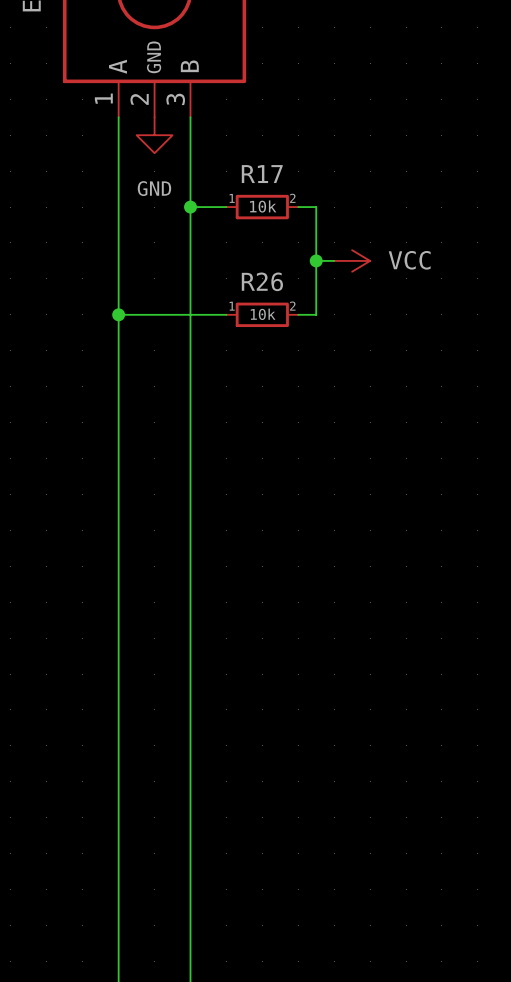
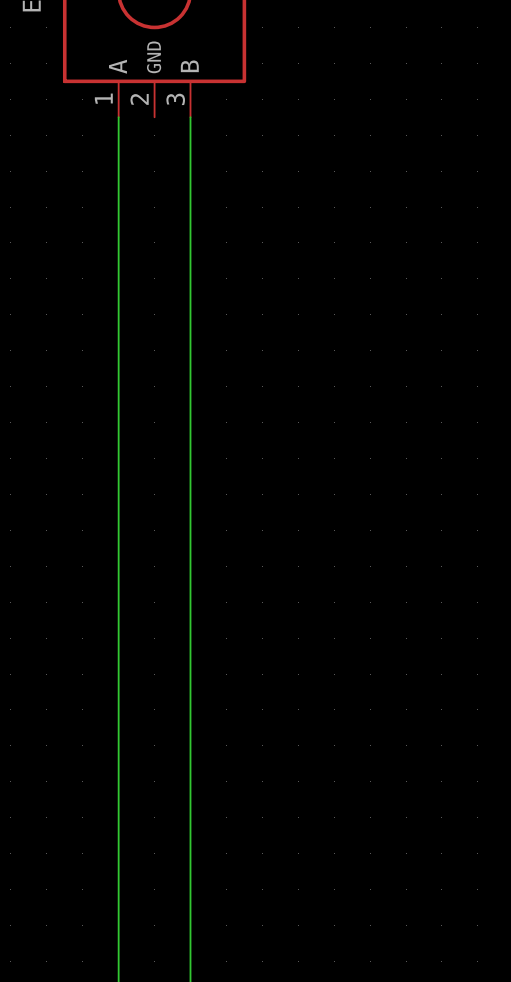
power symbol: GND (154, 135) -> none
wire: (190, 207) (226, 207) -> none
junction: (190, 207) -> none
R17: 10k (262, 207) -> none
wire: (298, 207) (316, 207) (316, 314) (298, 314) -> none
wire: (316, 260) (334, 260) -> none
junction: (316, 260) -> none
power symbol: VCC (352, 260) -> none
wire: (118, 314) (226, 314) -> none
junction: (118, 314) -> none
R26: 10k (262, 314) -> none

